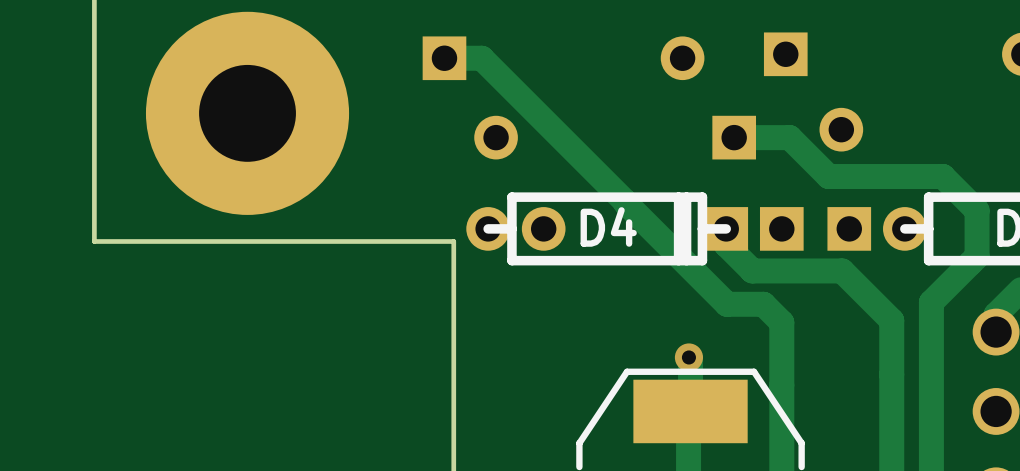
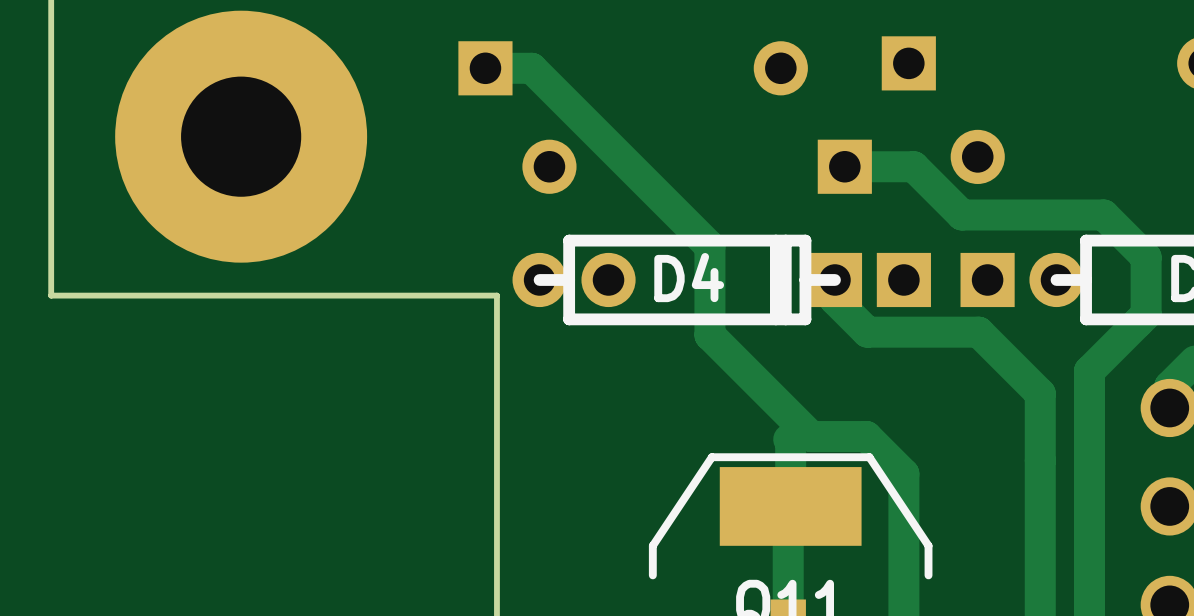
track: (625, 202) (727, 304) (763, 304) (781, 322) (781, 385) -> (709, 247) (709, 335) (811, 436) (866, 436) (903, 473)
via: (688, 357) -> none

